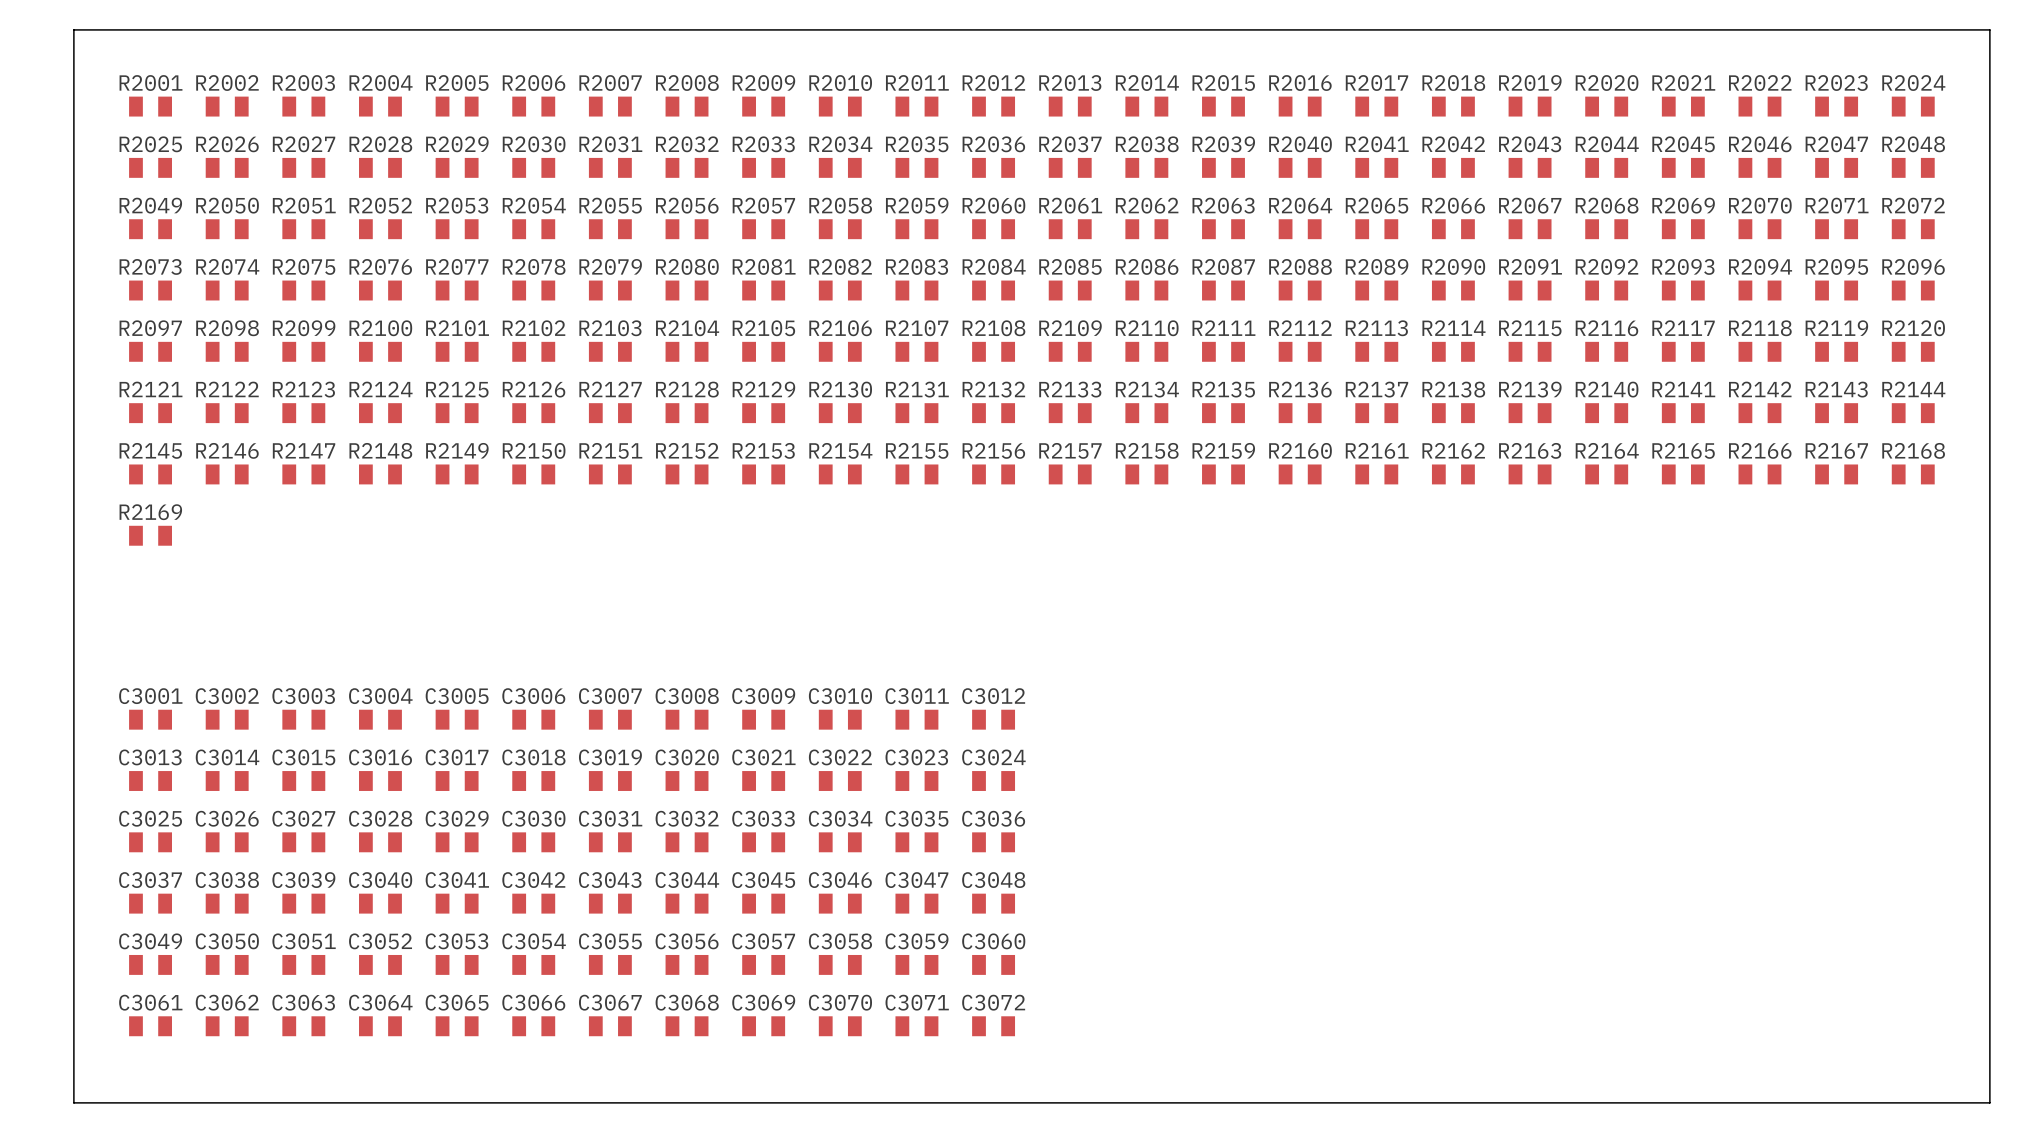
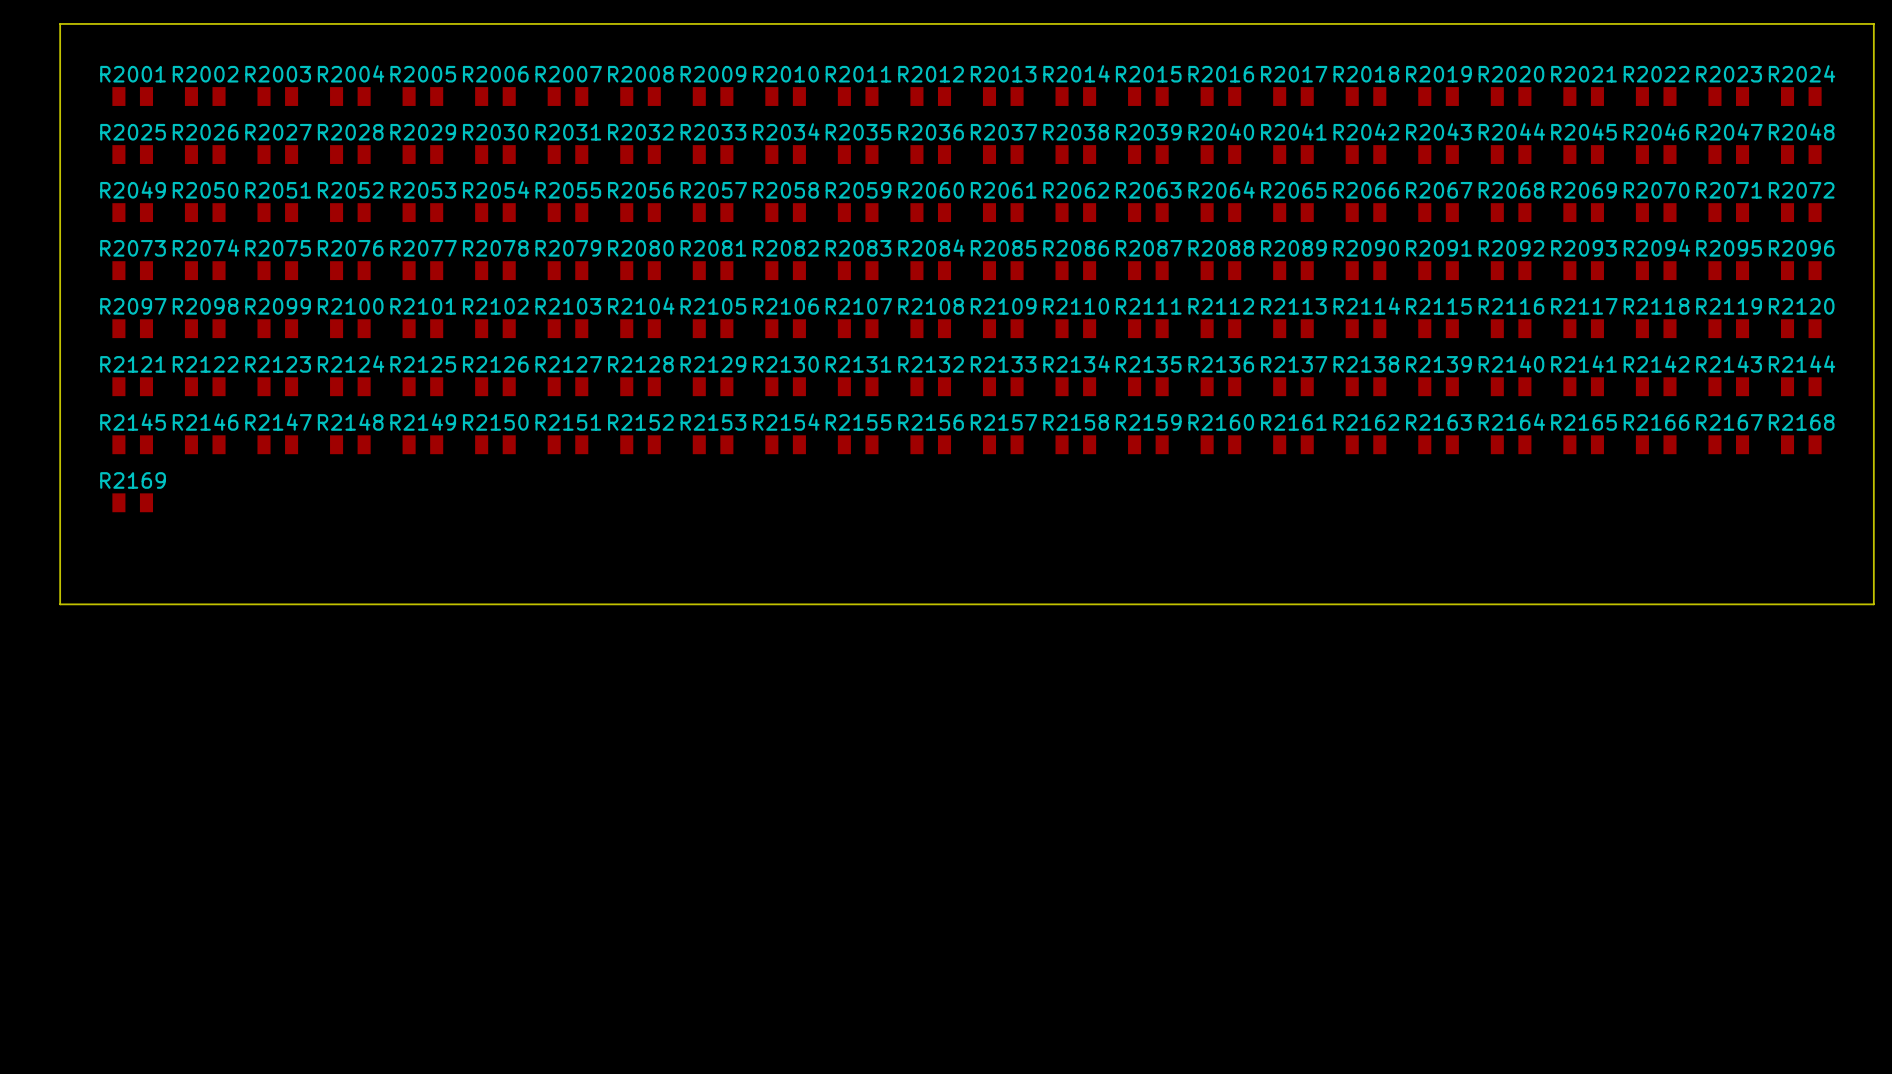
board edge: (73, 643) (73, 1102) (1989, 1102) (1989, 643) -> (60, 604) (1873, 604)
C3001: (150, 719) -> none
C3002: (227, 719) -> none
C3003: (303, 719) -> none
C3004: (380, 719) -> none
C3005: (457, 719) -> none
C3006: (533, 719) -> none
C3007: (610, 719) -> none
C3008: (687, 719) -> none
C3009: (763, 719) -> none
C3010: (840, 719) -> none
C3011: (916, 719) -> none
C3012: (993, 719) -> none
C3013: (150, 781) -> none
C3014: (227, 781) -> none
C3015: (303, 781) -> none
C3016: (380, 781) -> none
C3017: (457, 781) -> none
C3018: (533, 781) -> none
C3019: (610, 781) -> none
C3020: (687, 781) -> none
C3021: (763, 781) -> none
C3022: (840, 781) -> none
C3023: (916, 781) -> none
C3024: (993, 781) -> none
C3025: (150, 842) -> none
C3026: (227, 842) -> none
C3027: (303, 842) -> none
C3028: (380, 842) -> none
C3029: (457, 842) -> none
C3030: (533, 842) -> none
C3031: (610, 842) -> none
C3032: (687, 842) -> none
C3033: (763, 842) -> none
C3034: (840, 842) -> none
C3035: (916, 842) -> none
C3036: (993, 842) -> none
C3037: (150, 903) -> none
C3038: (227, 903) -> none
C3039: (303, 903) -> none
C3040: (380, 903) -> none
C3041: (457, 903) -> none
C3042: (533, 903) -> none
C3043: (610, 903) -> none
C3044: (687, 903) -> none
C3045: (763, 903) -> none
C3046: (840, 903) -> none
C3047: (916, 903) -> none
C3048: (993, 903) -> none
C3049: (150, 964) -> none
C3050: (227, 964) -> none
C3051: (303, 964) -> none
C3052: (380, 964) -> none
C3053: (457, 964) -> none
C3054: (533, 964) -> none
C3055: (610, 964) -> none
C3056: (687, 964) -> none
C3057: (763, 964) -> none
C3058: (840, 964) -> none
C3059: (916, 964) -> none
C3060: (993, 964) -> none
C3061: (150, 1026) -> none
C3062: (227, 1026) -> none
C3063: (303, 1026) -> none
C3064: (380, 1026) -> none
C3065: (457, 1026) -> none
C3066: (533, 1026) -> none
C3067: (610, 1026) -> none
C3068: (687, 1026) -> none
C3069: (763, 1026) -> none
C3070: (840, 1026) -> none
C3071: (916, 1026) -> none
C3072: (993, 1026) -> none

